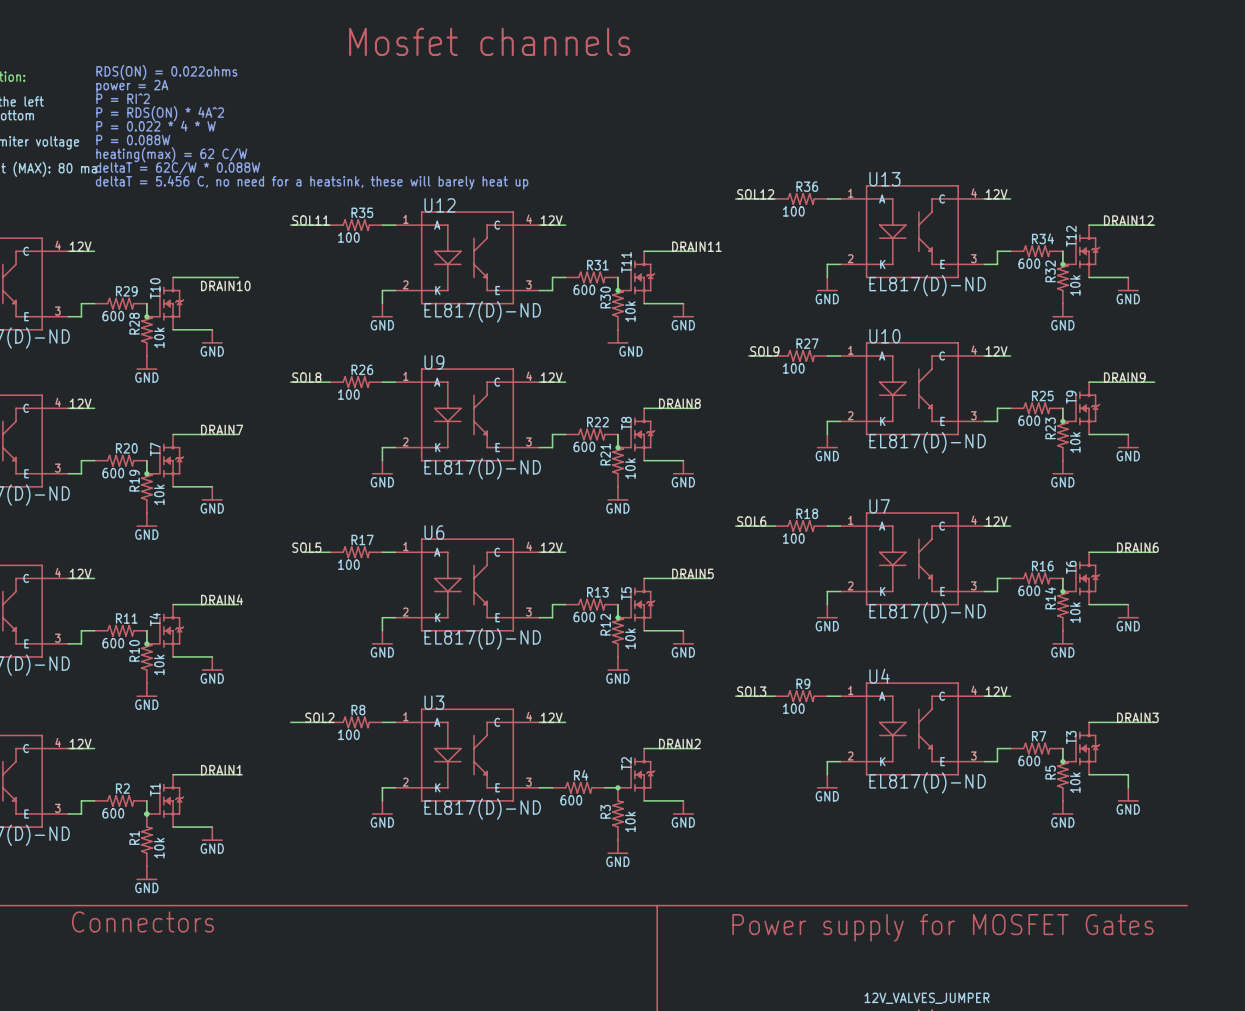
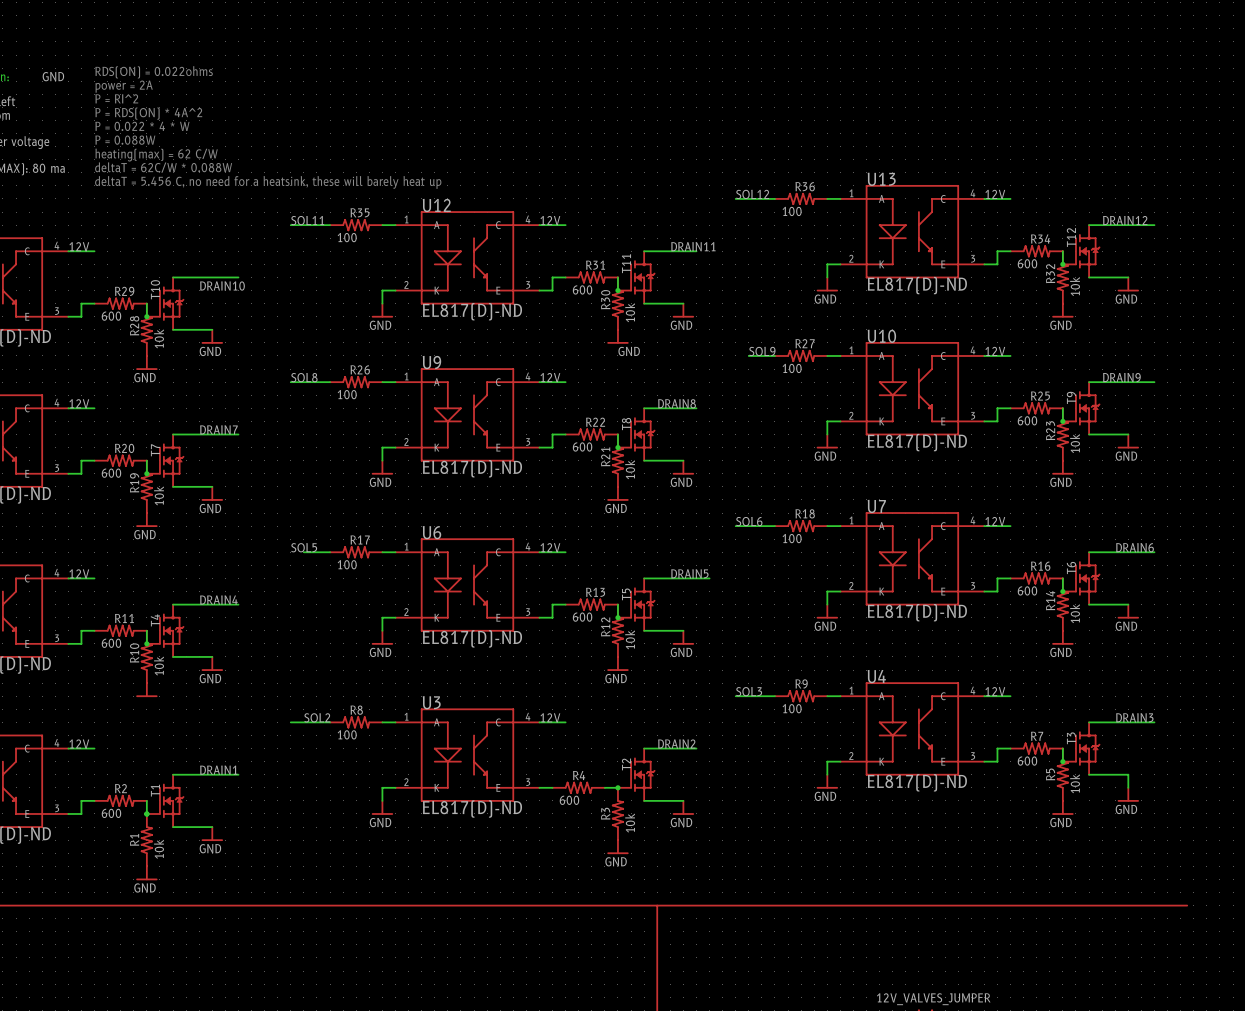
text: Mosfet channels (489, 41) -> none
power symbol text position: GND (146, 704) -> GND (53, 76)
text: Connectors (142, 921) -> none
text: Power supply for MOSFET Gates (943, 927) -> none

